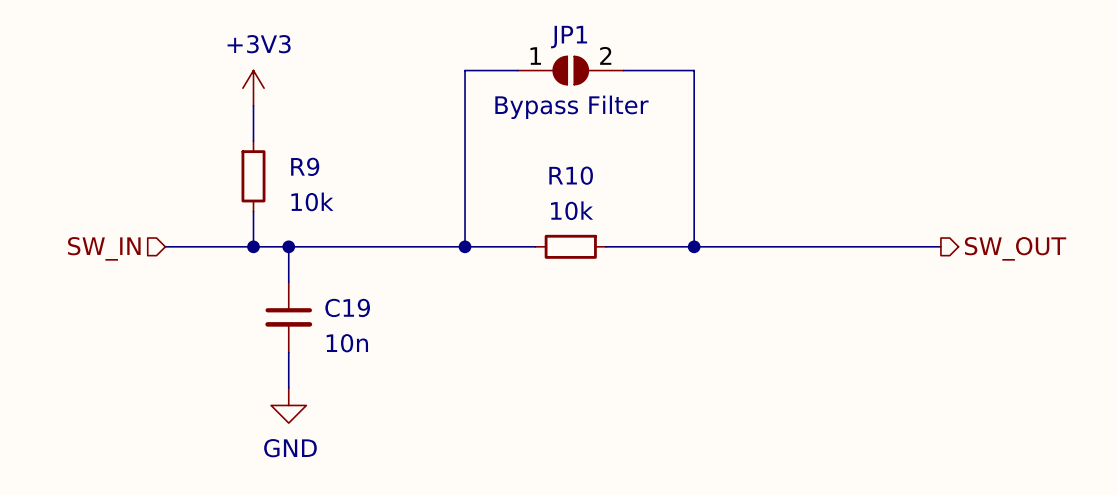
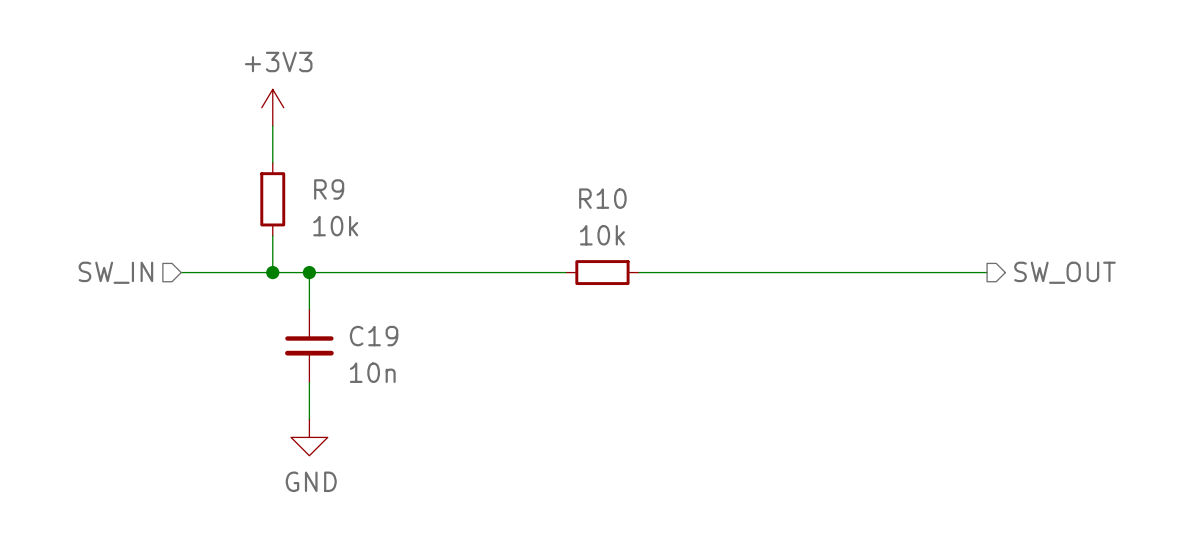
wire: (517, 70) (465, 70) (465, 246) -> none
JP1: Bypass Filter (570, 70) -> none
wire: (623, 70) (694, 70) (694, 246) -> none
junction: (465, 246) -> none
junction: (694, 246) -> none

